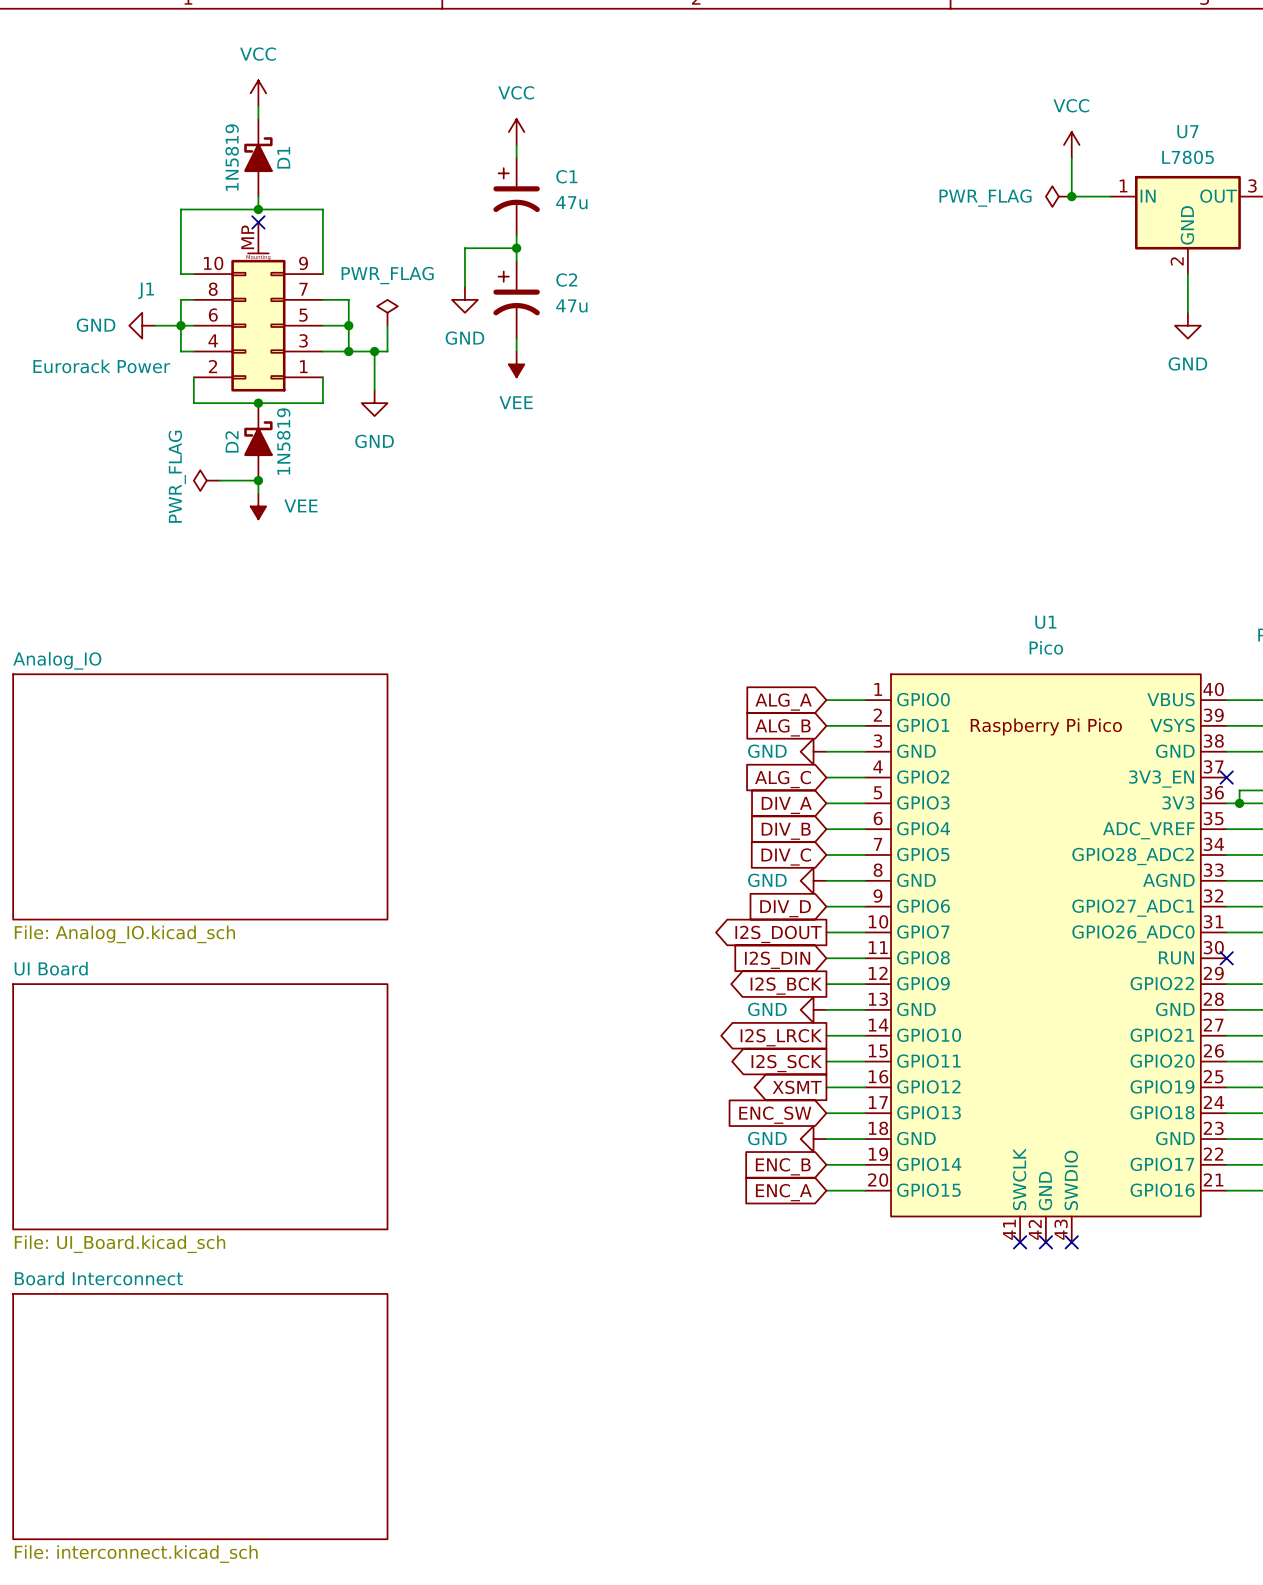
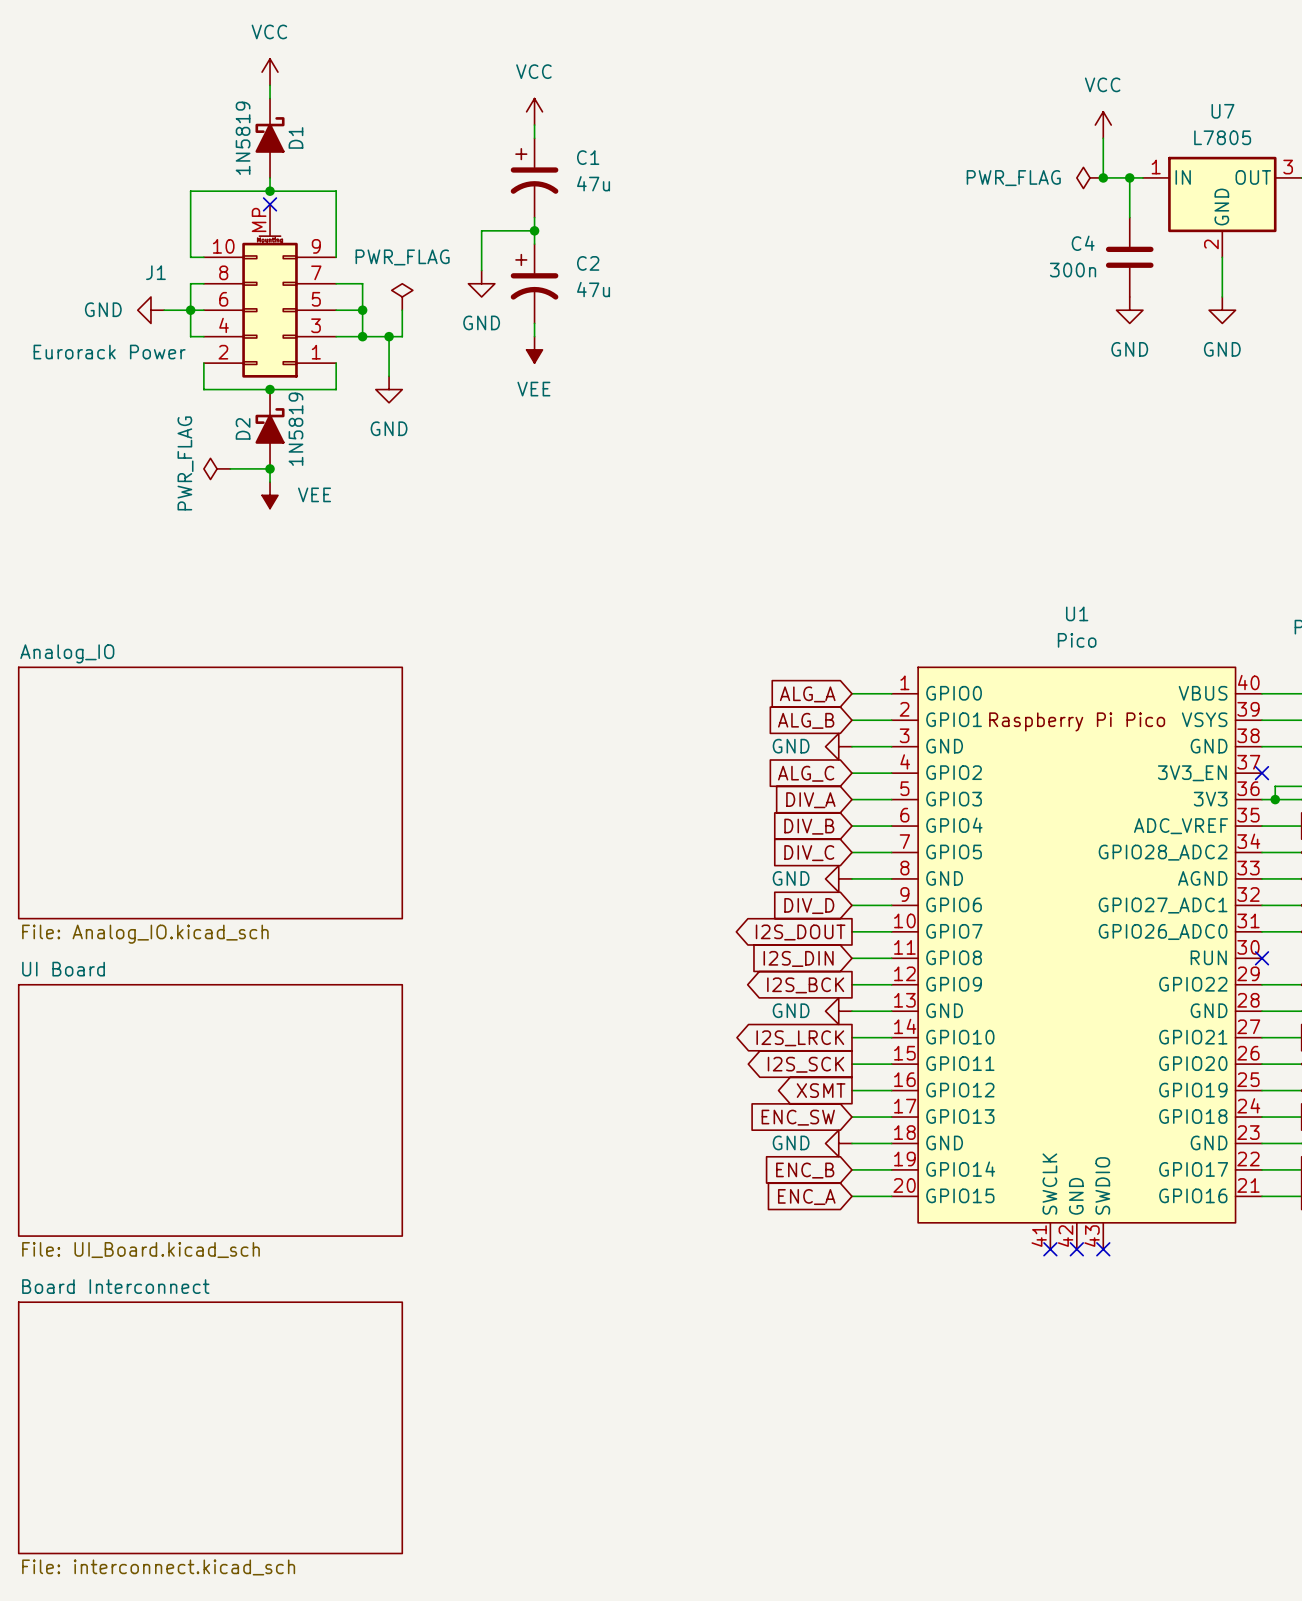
wire: none -> (1129, 177) (1129, 217)
junction: none -> (1129, 177)
C4: none -> 300n (1129, 257)
power symbol: none -> GND (1129, 310)

